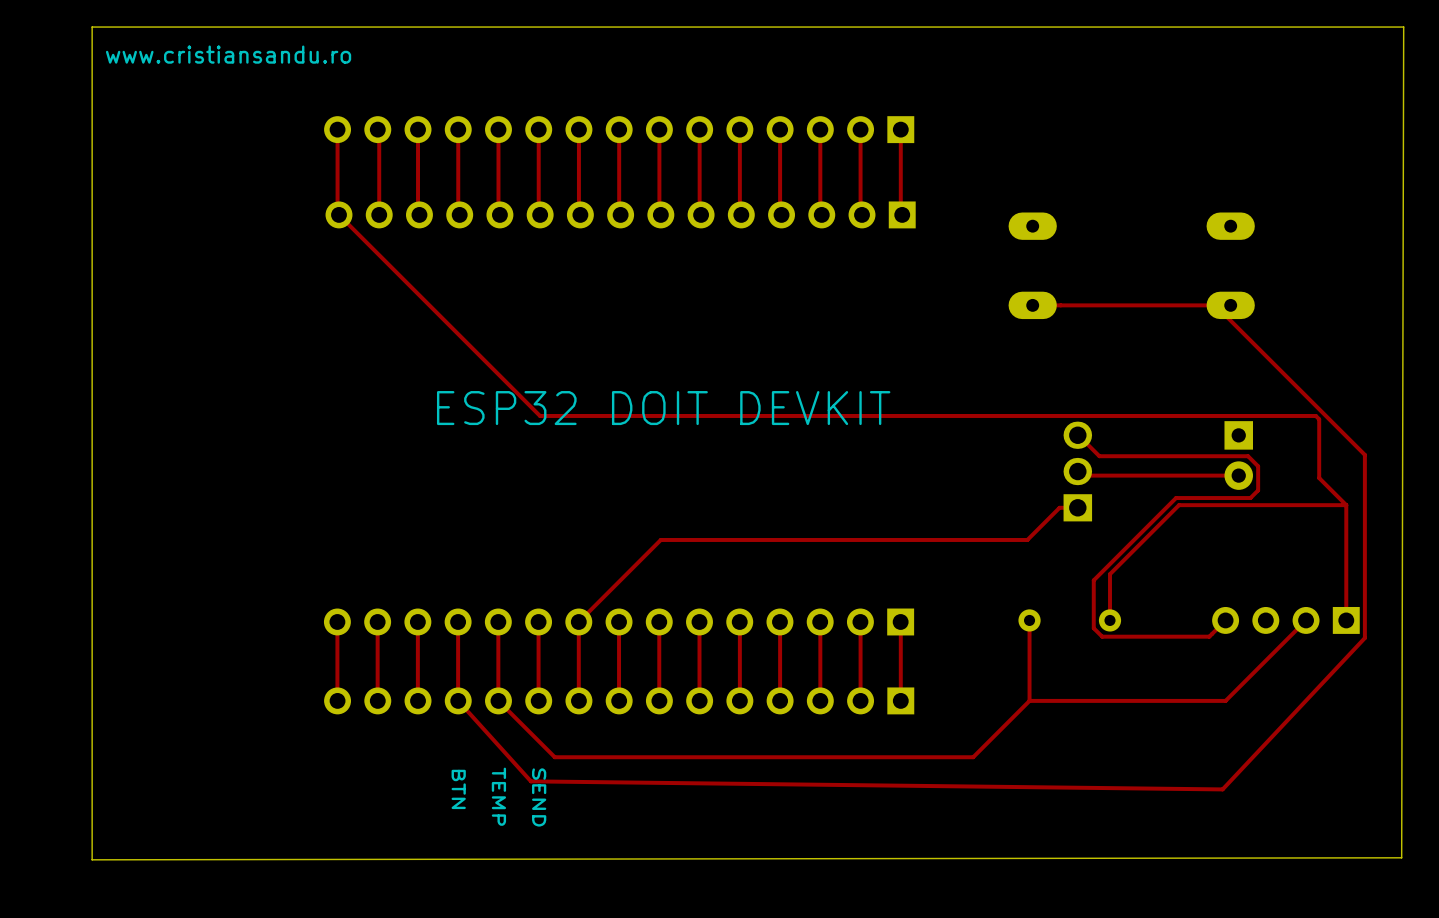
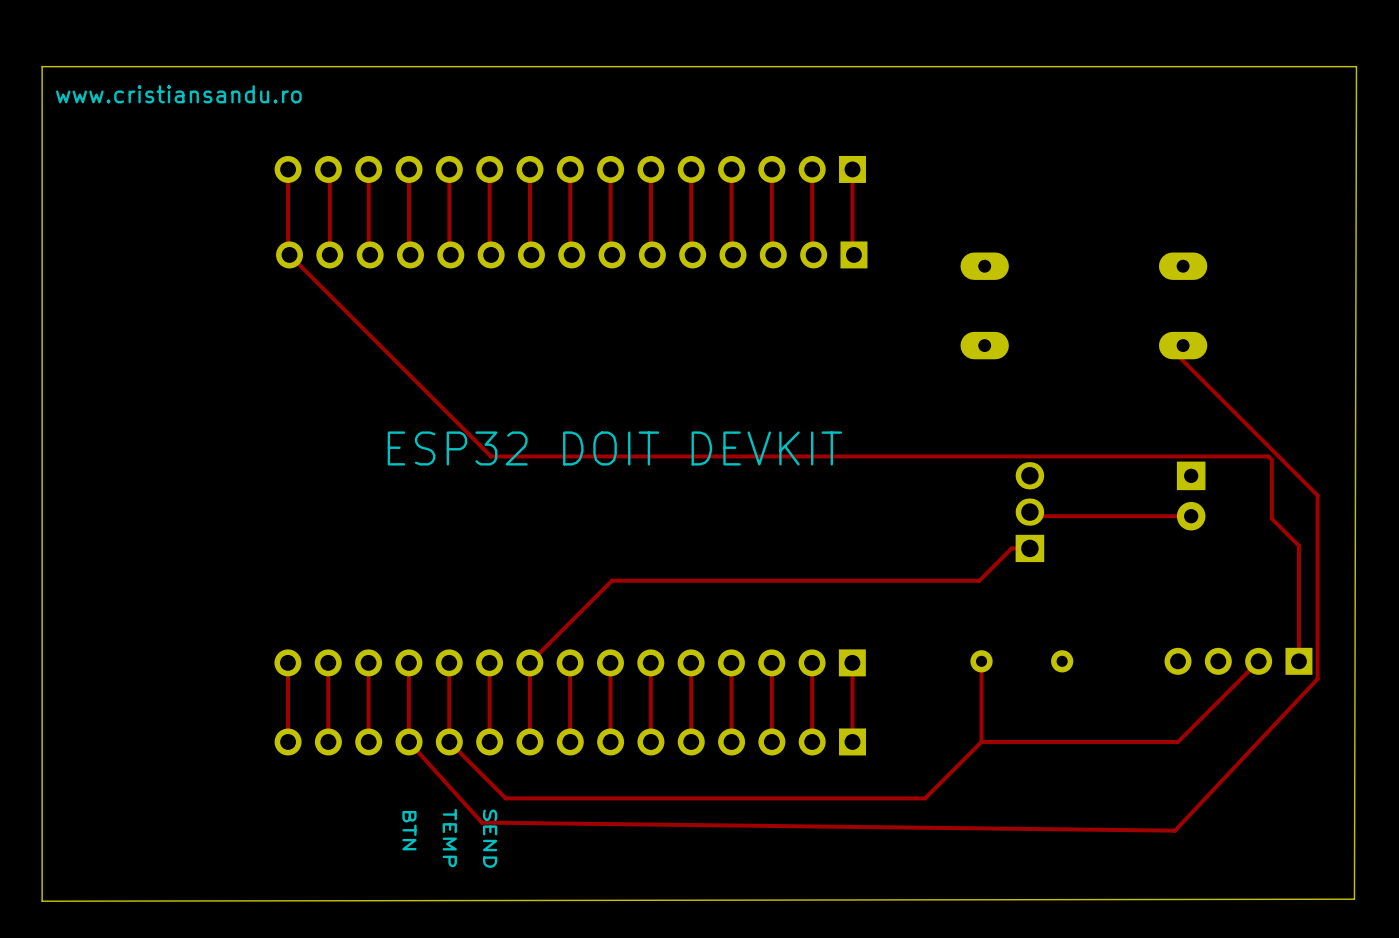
top track: (1230, 305) (1032, 305) -> none
top track: (1077, 435) (1099, 456) (1248, 456) (1258, 466) (1258, 490) (1250, 498) (1176, 498) (1093, 580) (1093, 628) (1102, 636) (1209, 636) (1225, 620) -> none
top track: (1346, 505) (1179, 505) (1110, 574) (1110, 620) -> none

